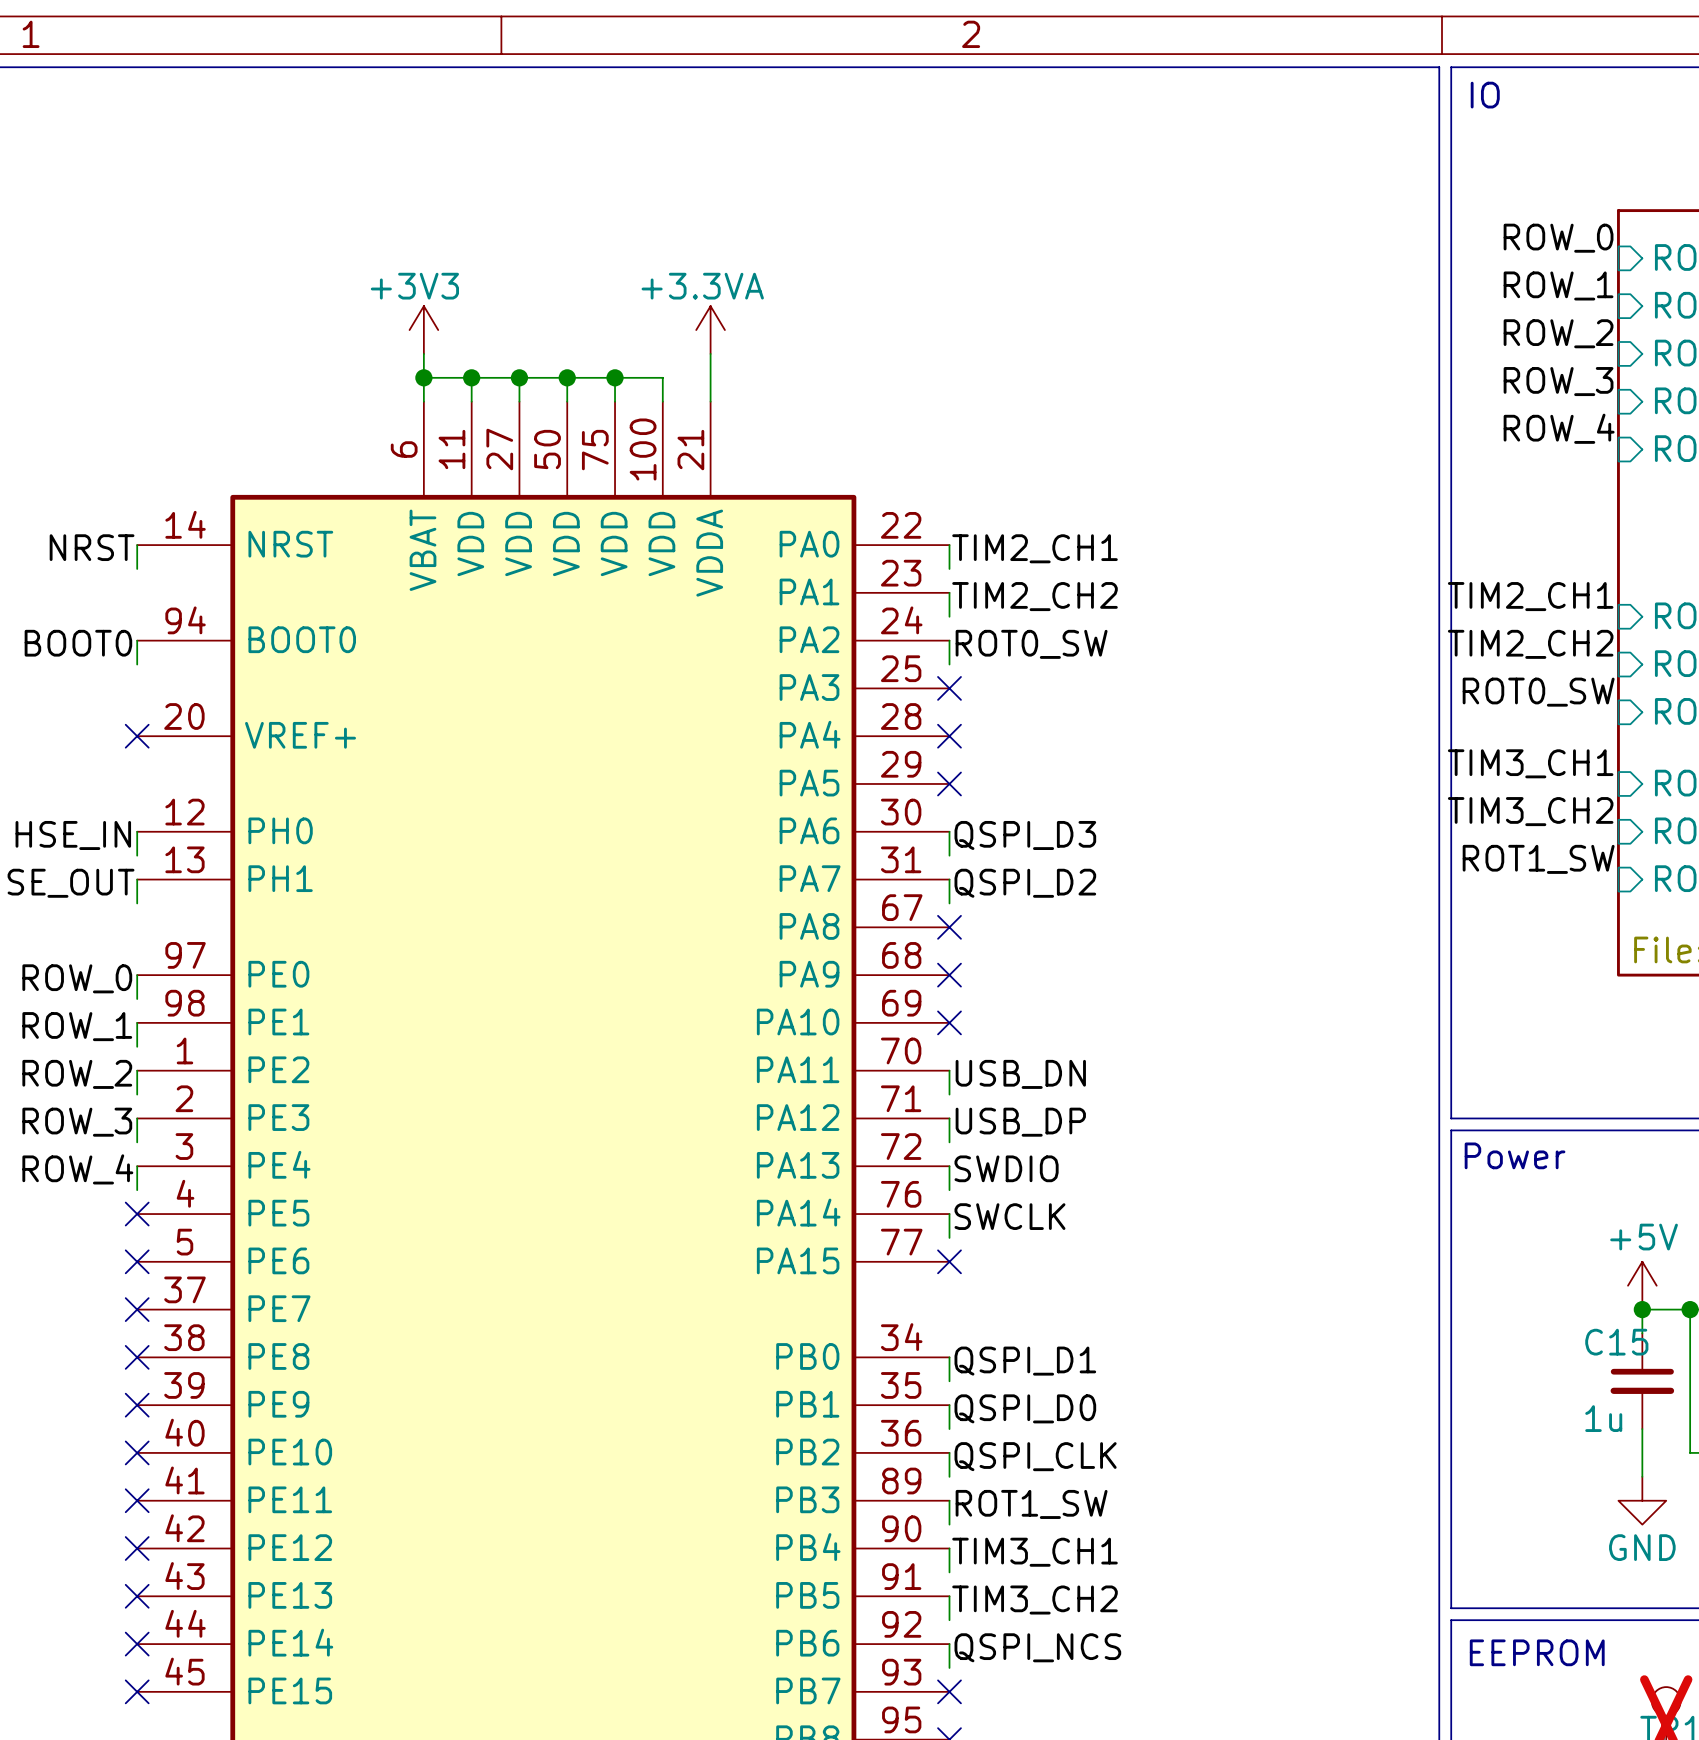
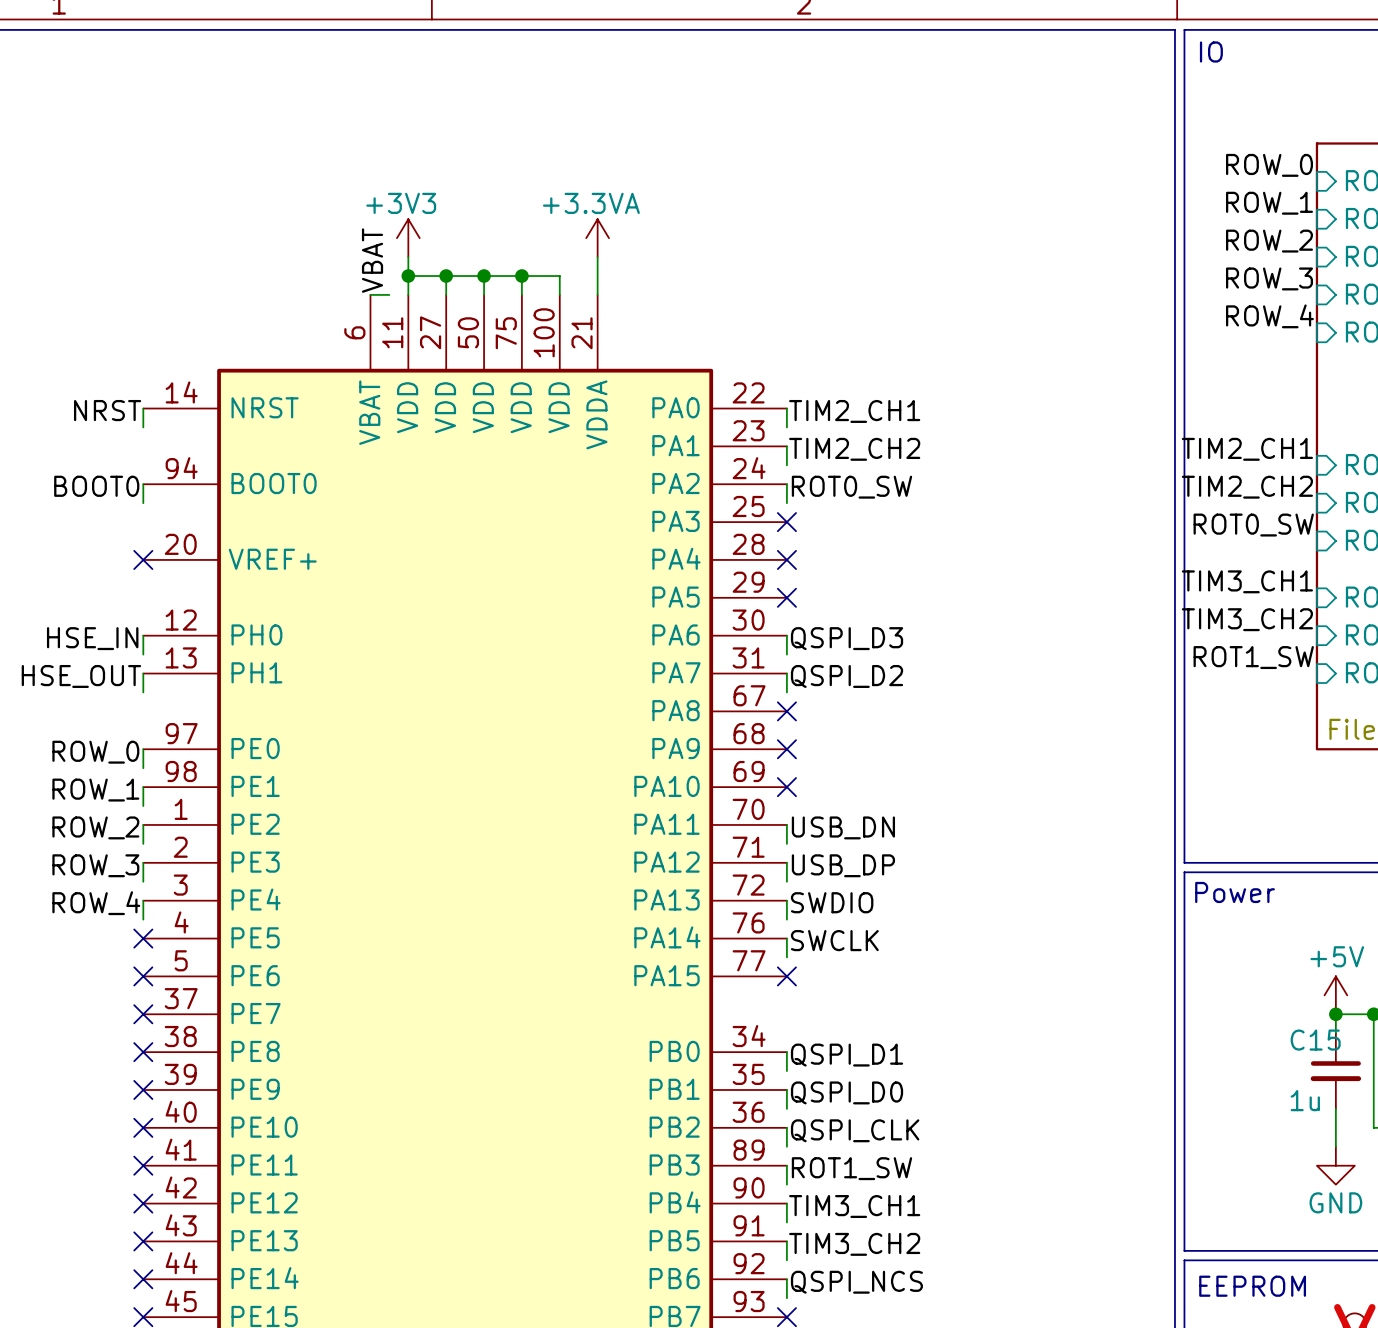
power symbol position: +3V3 (423, 330) -> +3V3 (408, 238)
wire: (423, 353) (423, 401) -> (389, 294) (370, 294)
label: none -> VBAT (372, 260)
wire: (423, 377) (471, 377) -> (408, 257) (408, 276)
junction: (423, 377) -> none

